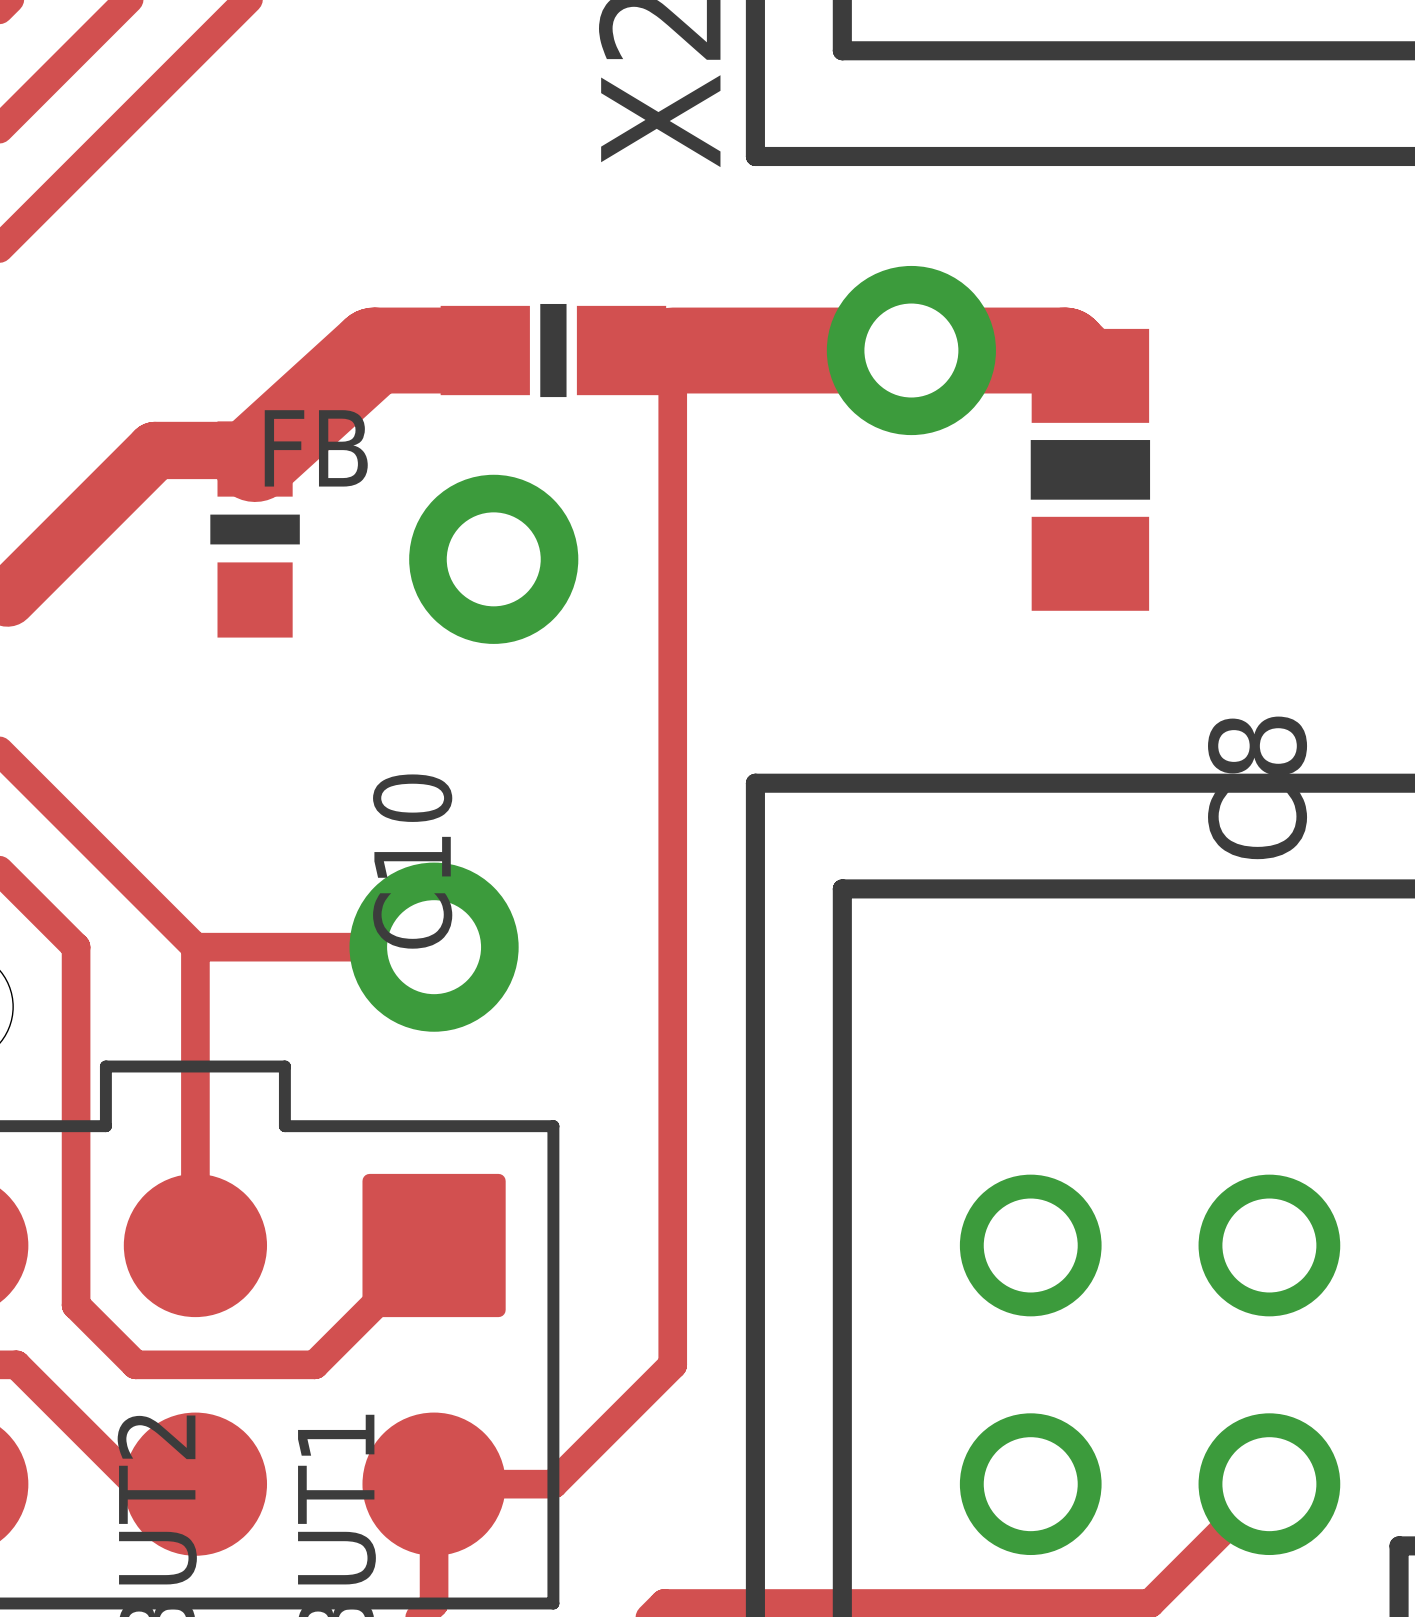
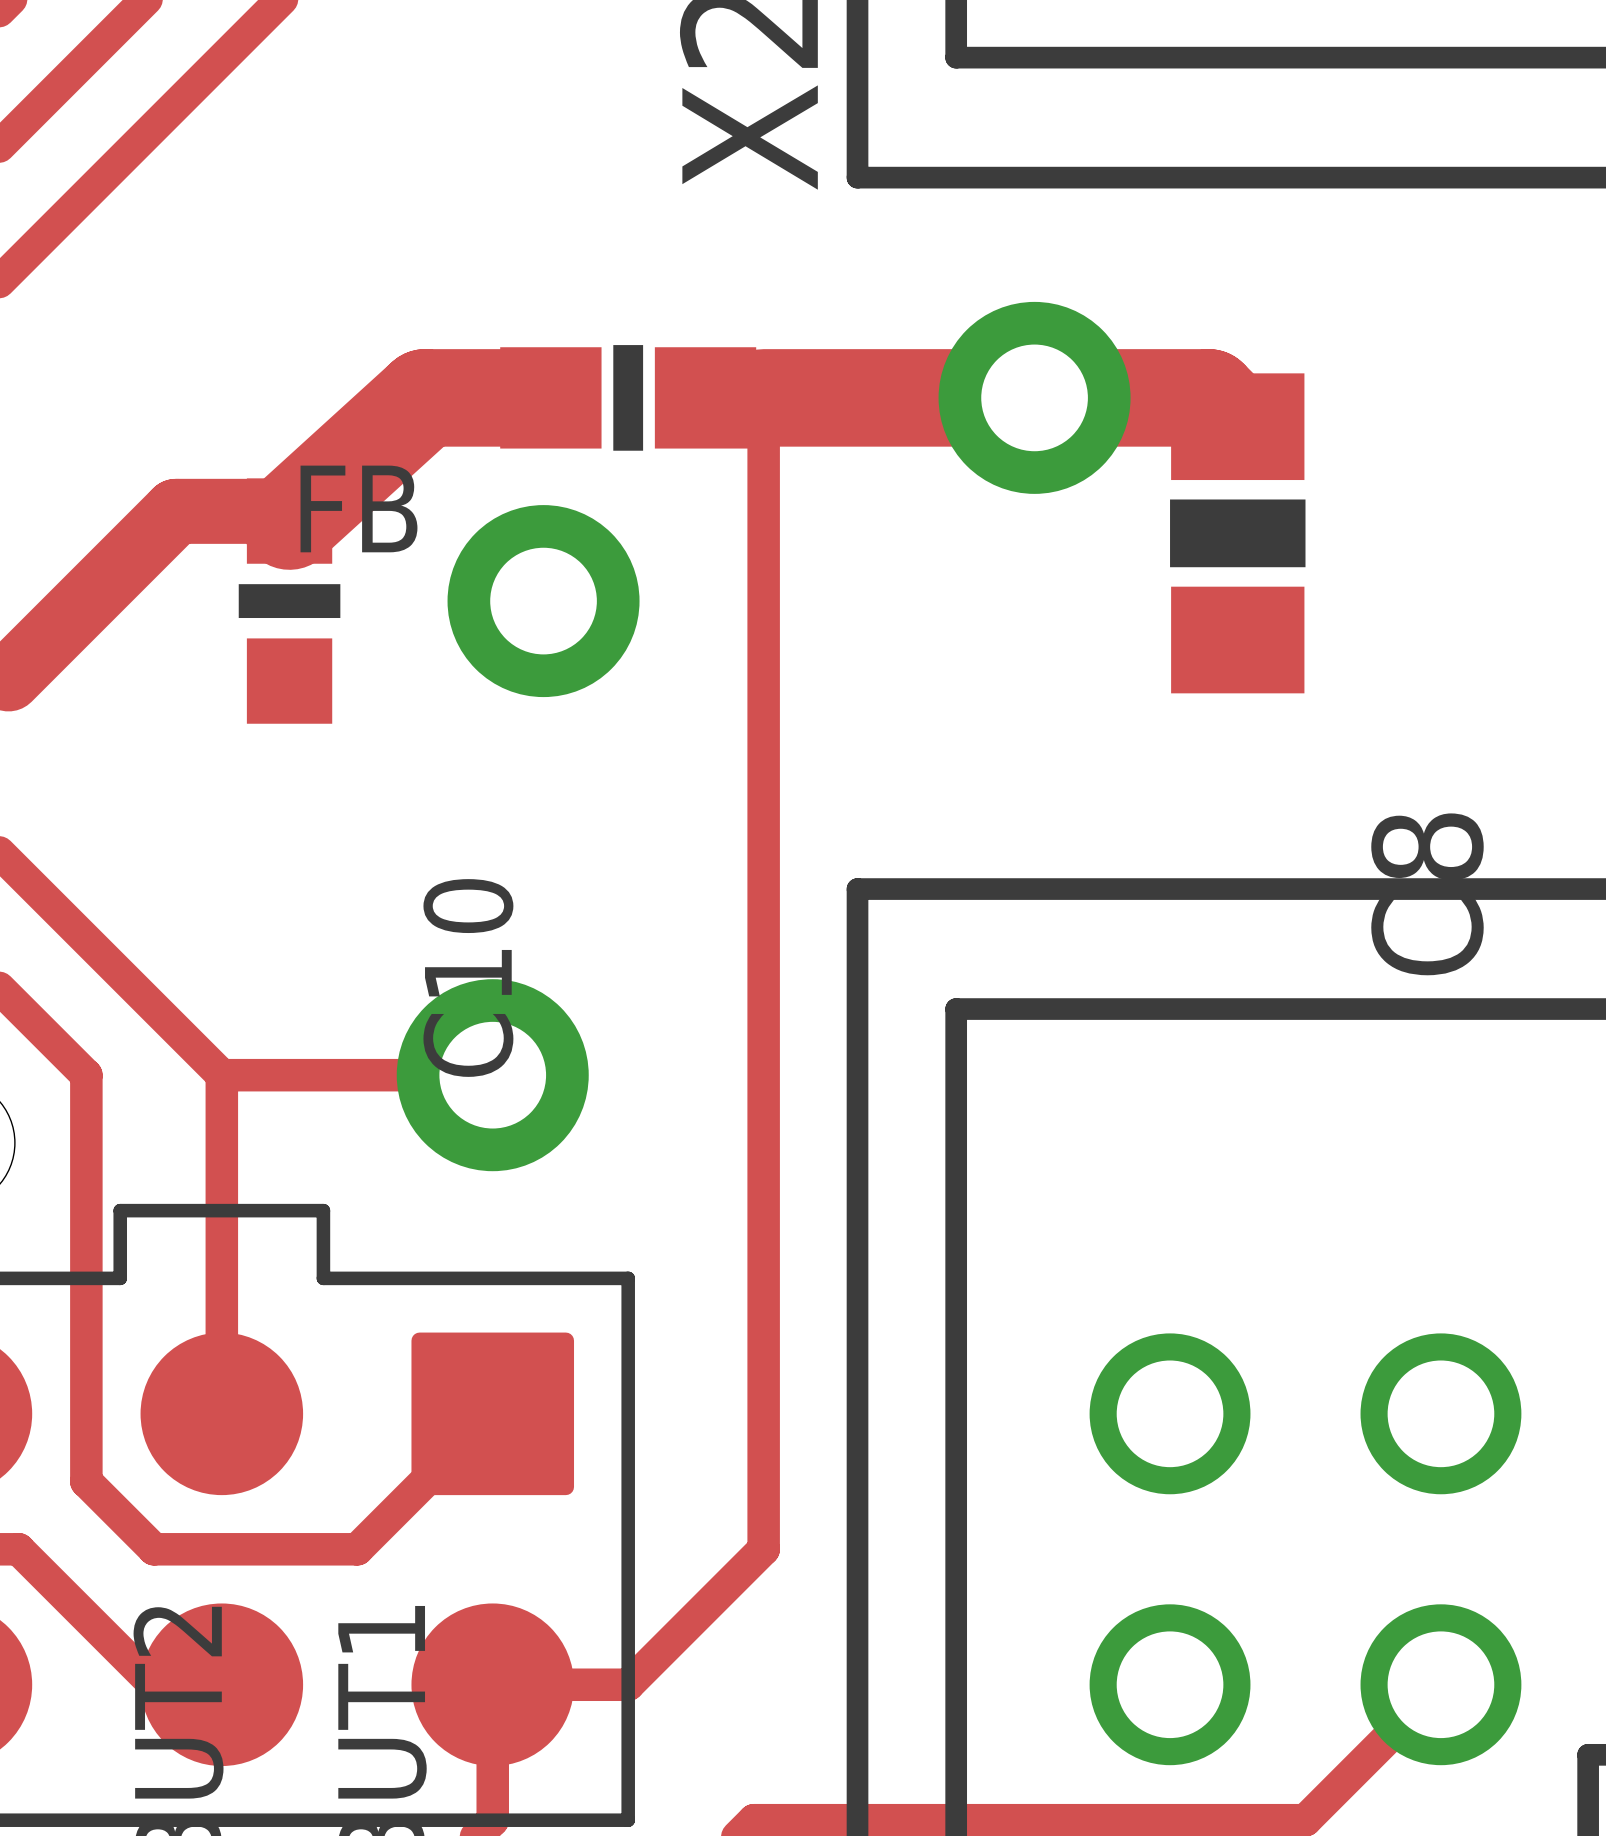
via position: (493, 559) -> (543, 601)

